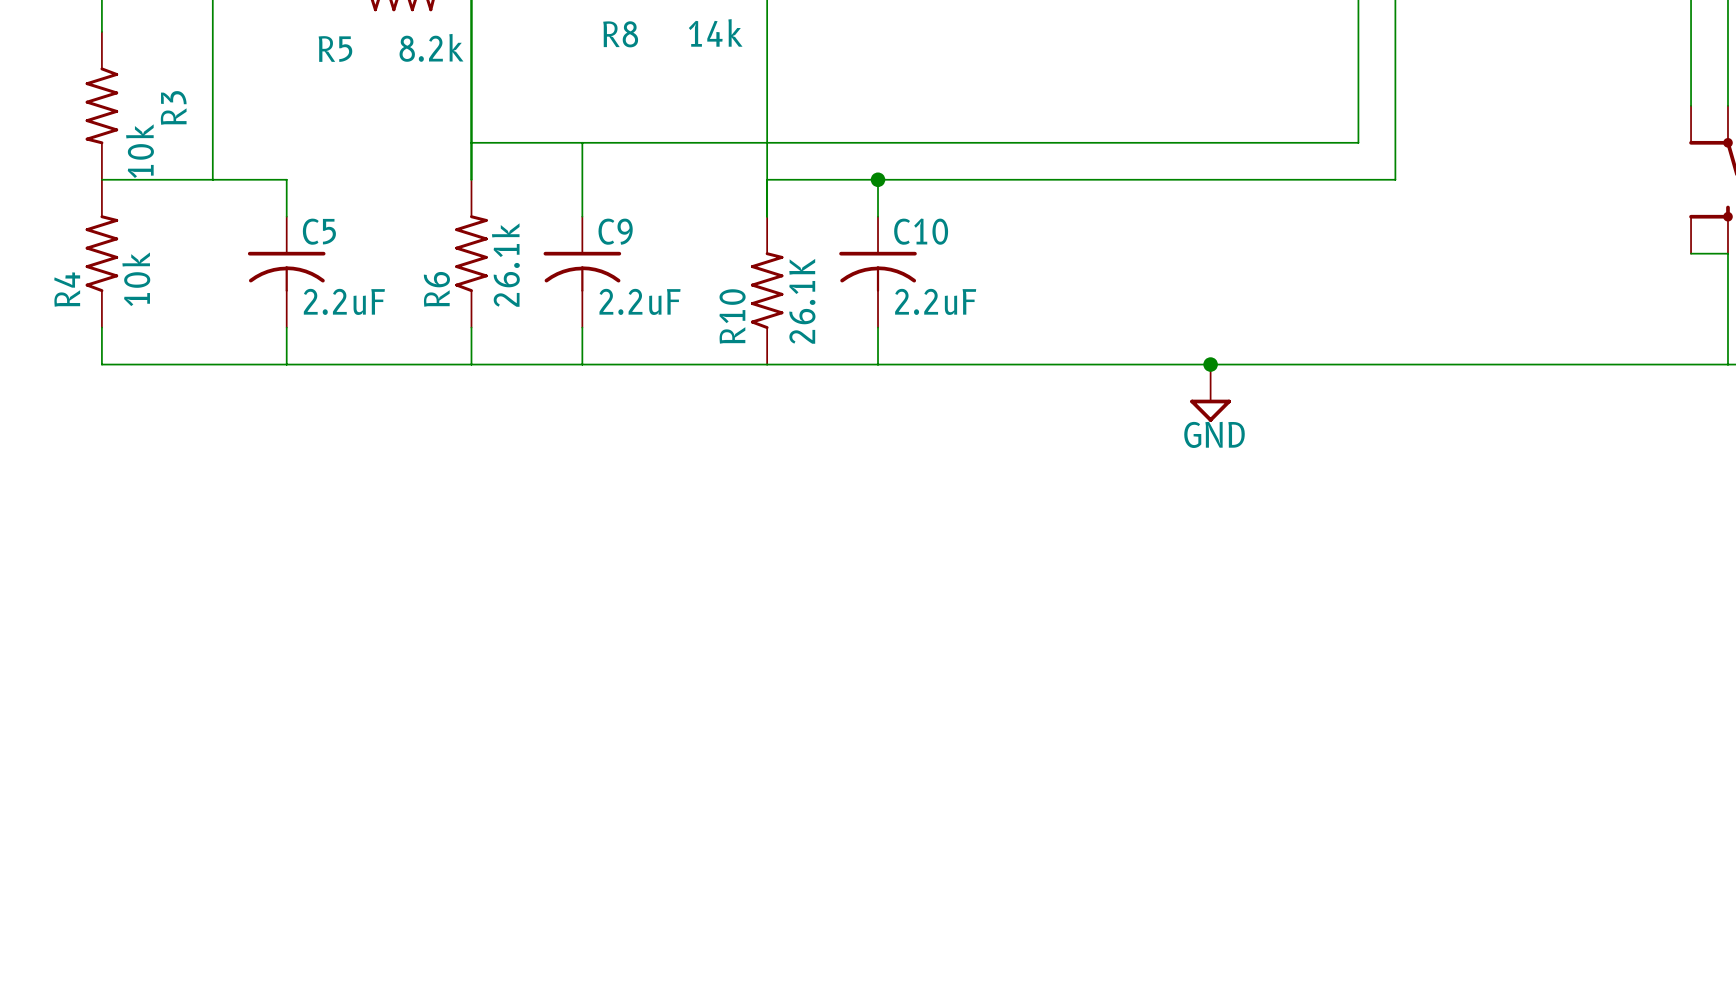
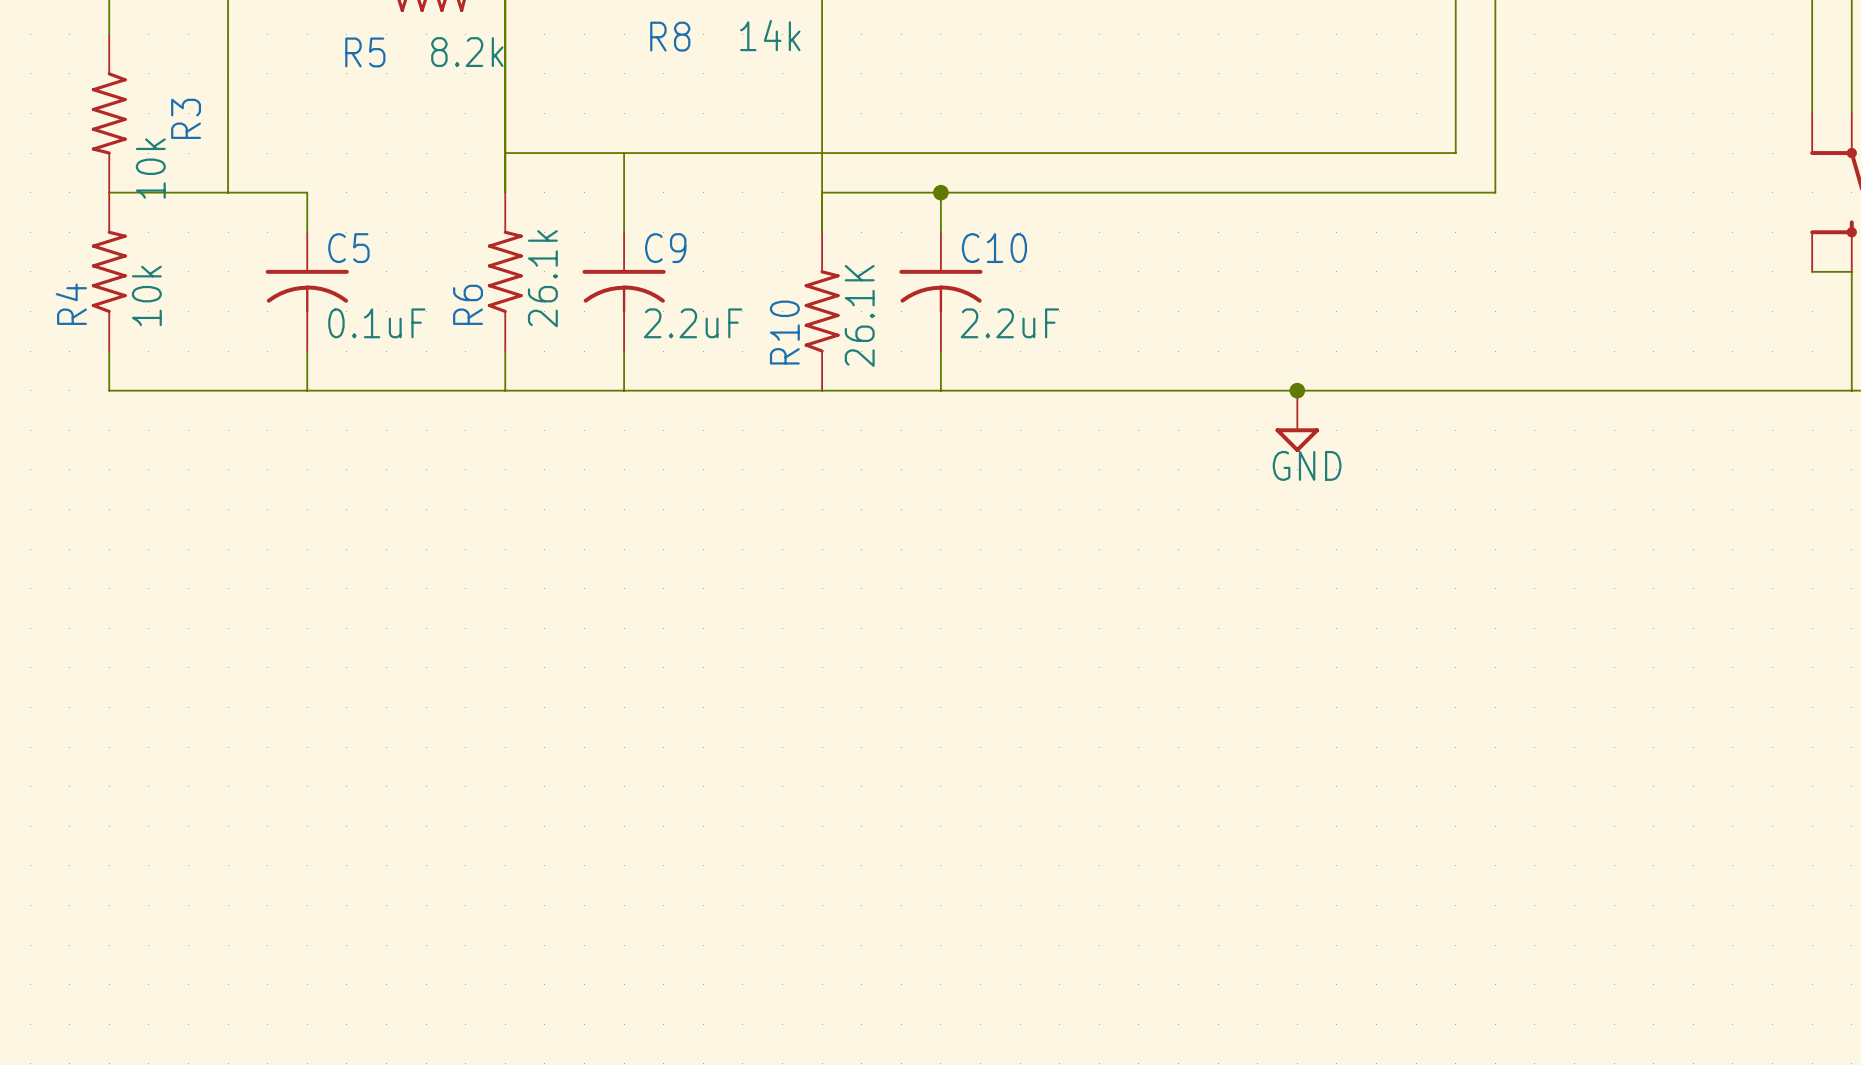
C5 value: 2.2uF (344, 301) -> 0.1uF (376, 323)

